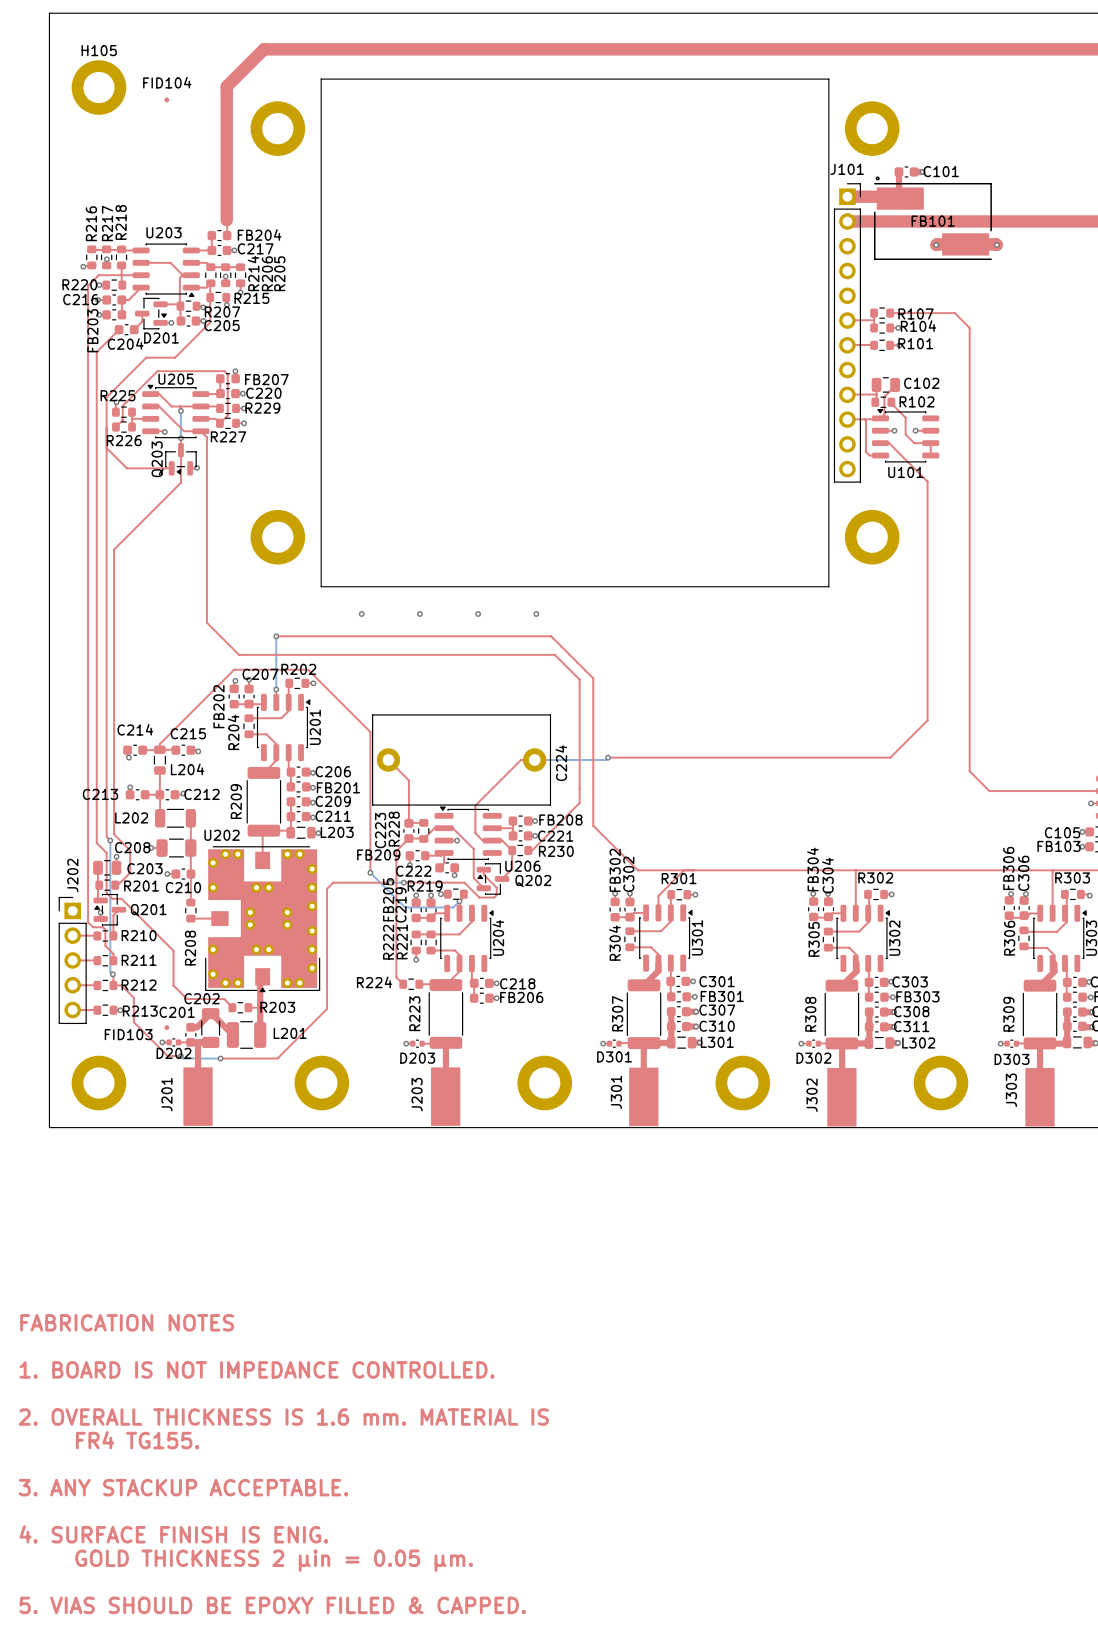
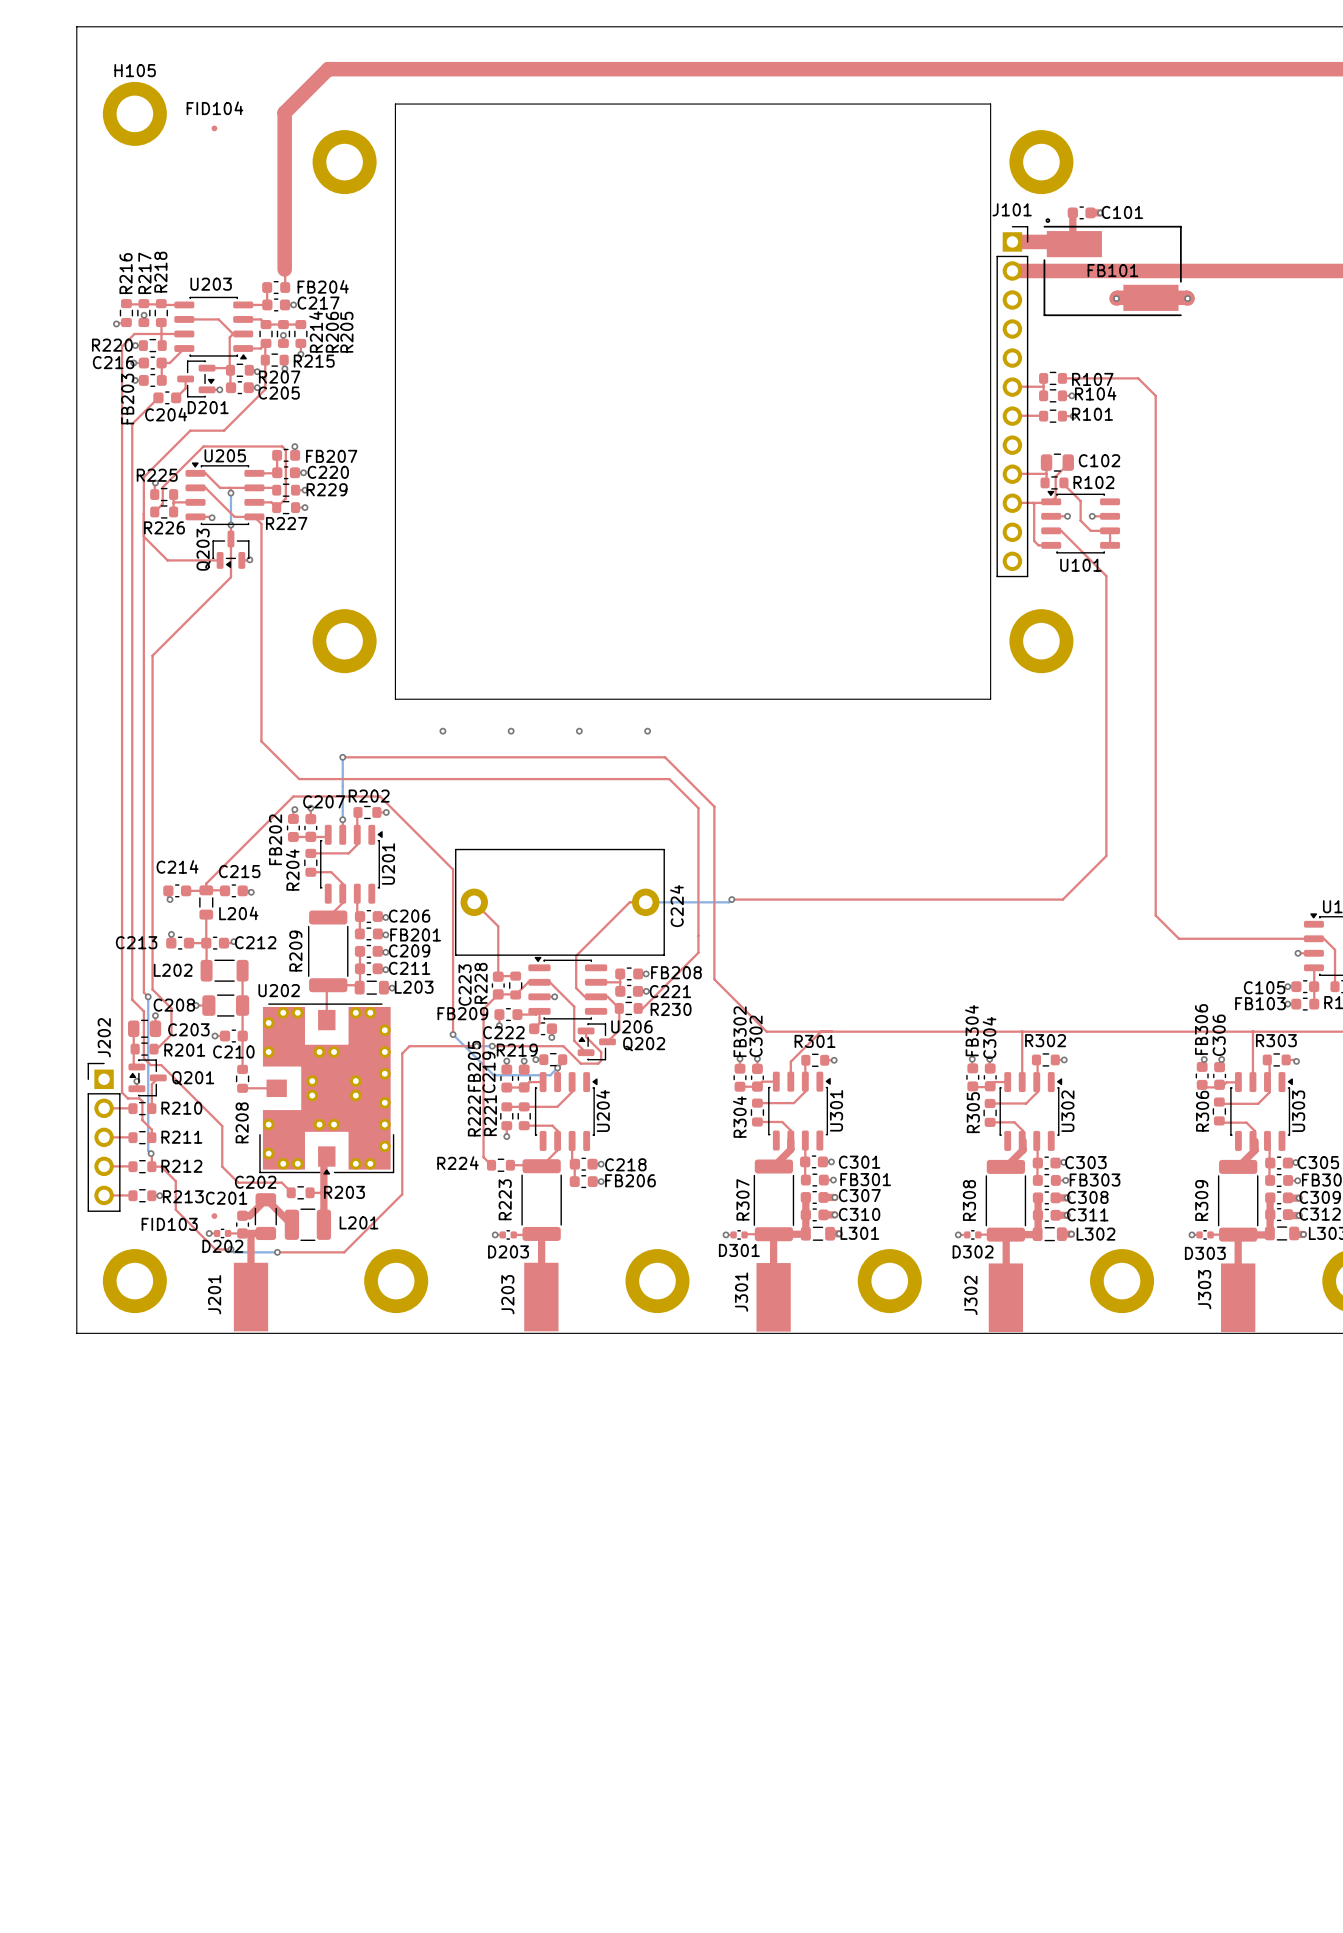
text: FABRICATION NOTES (127, 1322) -> none
text: 1. BOARD IS NOT IMPEDANCE CONTROLLED. (257, 1369) -> none
text: 2. OVERALL THICKNESS IS 1.6 mm. MATERIAL IS (283, 1417) -> none
text: FR4 TG155. (137, 1440) -> none
text: 3. ANY STACKUP ACCEPTABLE. (183, 1487) -> none
text: 4. SURFACE FINISH IS ENIG. (173, 1534) -> none
text: GOLD THICKNESS 2 μin = 0.05 μm. (274, 1560) -> none
text: 5. VIAS SHOULD BE EPOXY FILLED & CAPPED. (272, 1605) -> none

